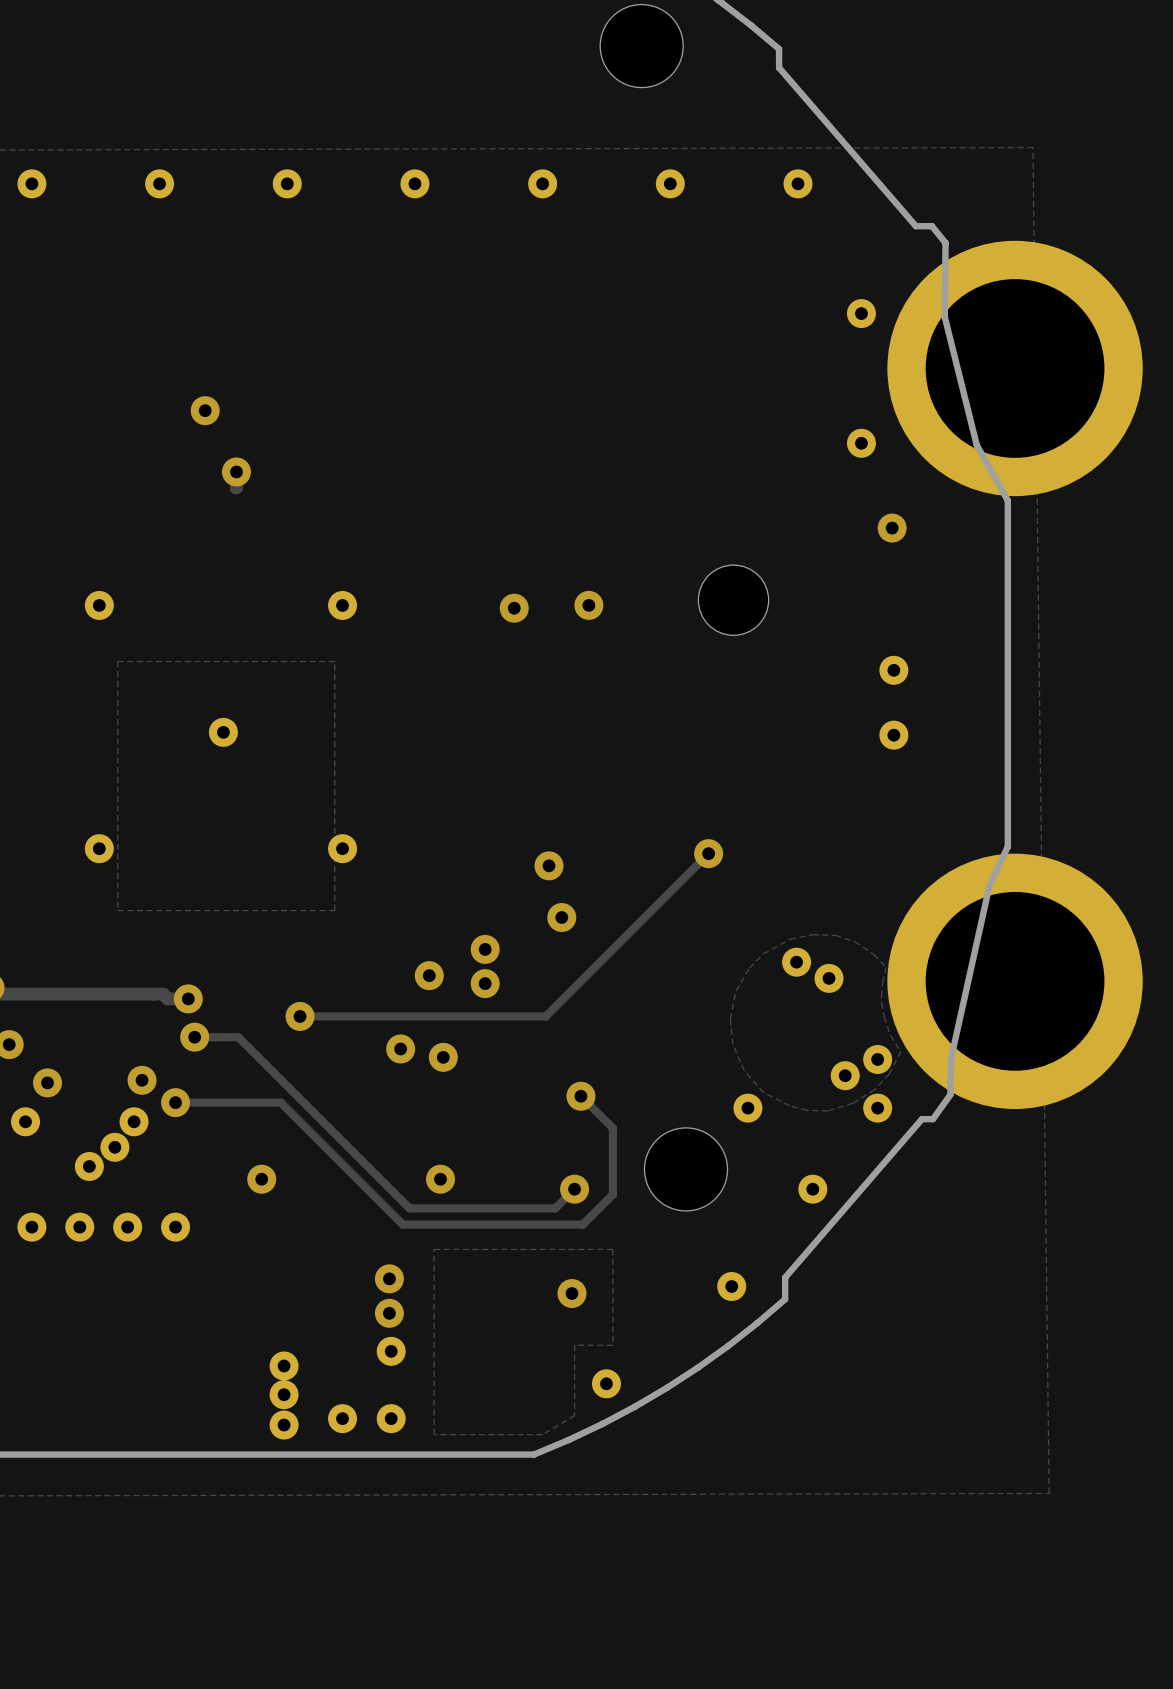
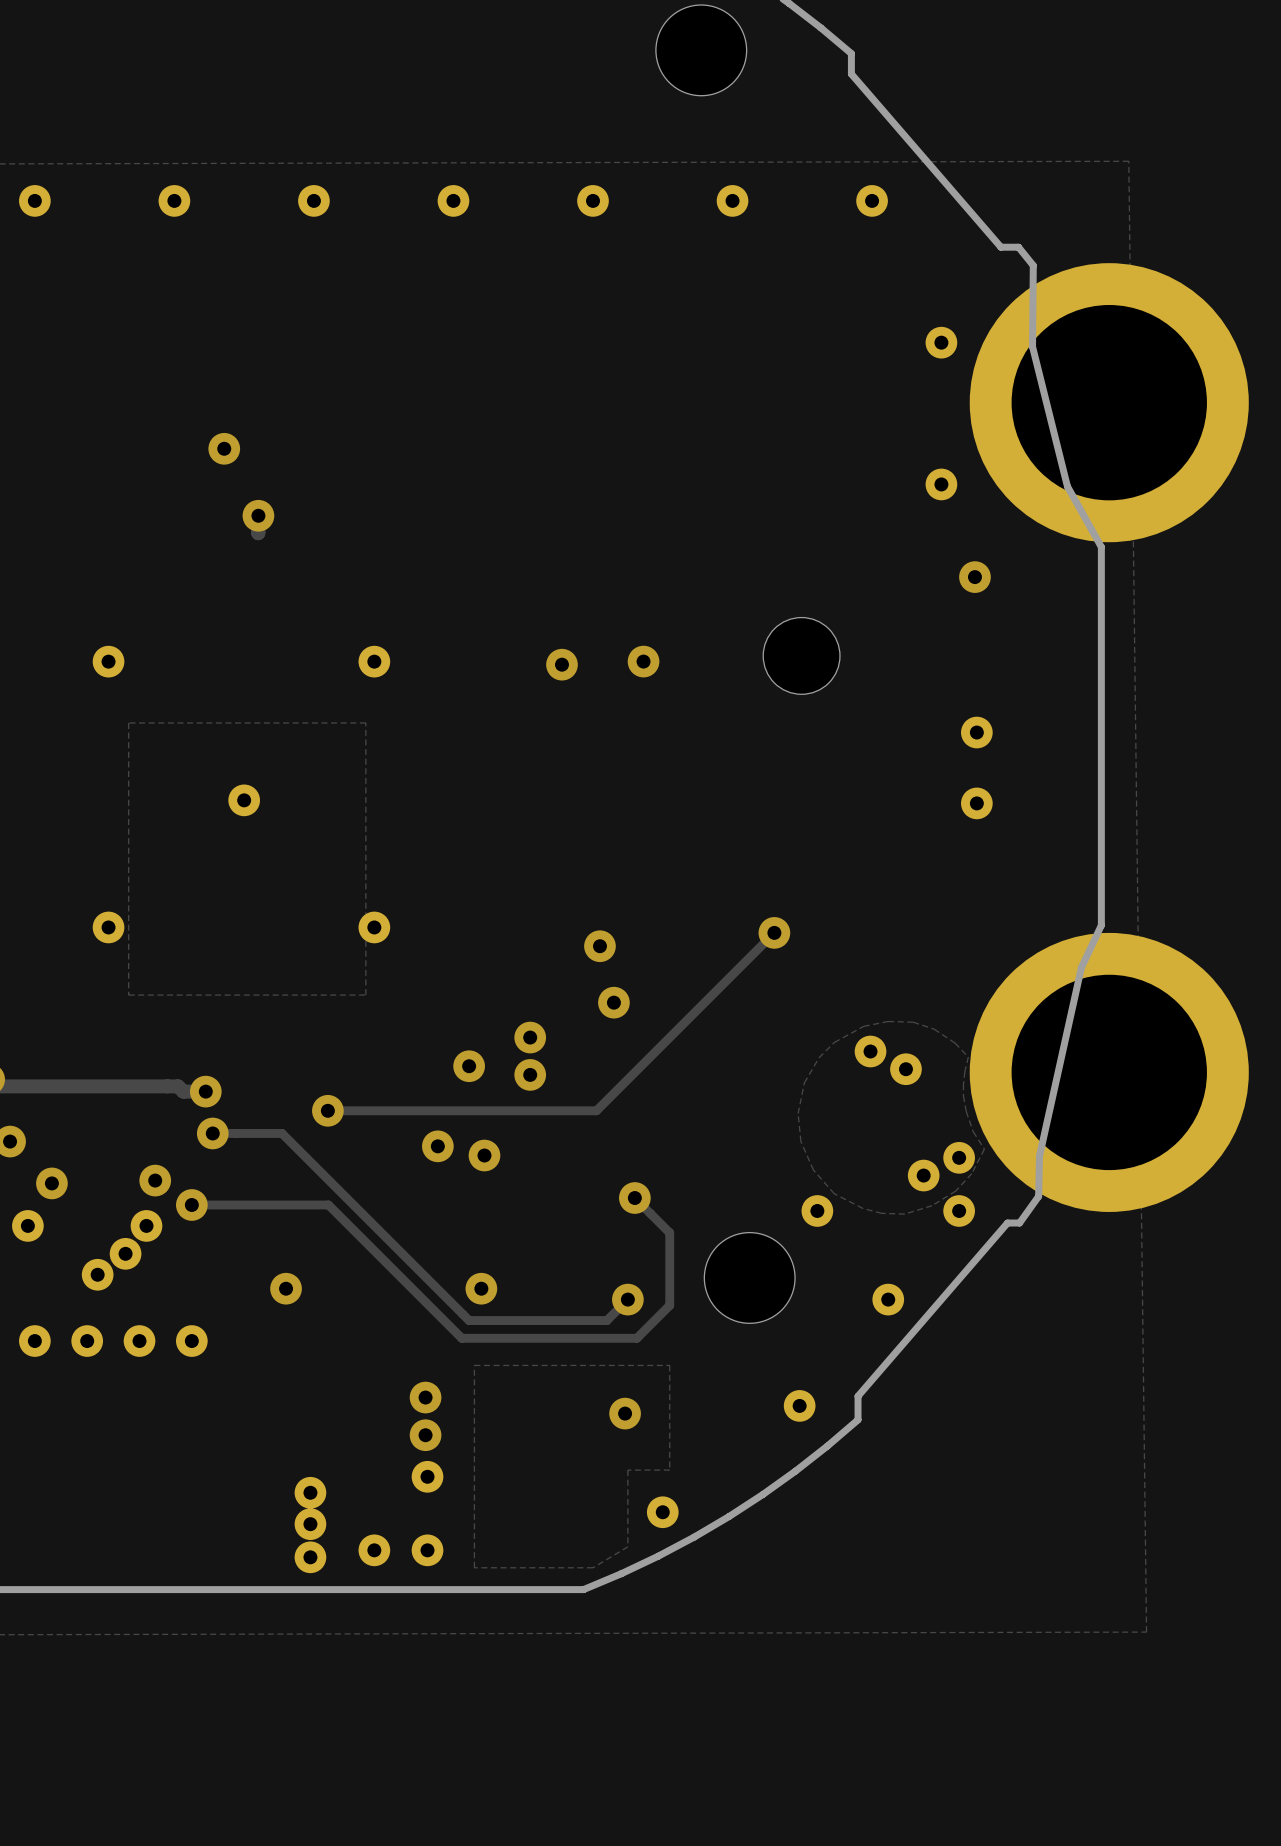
track: (238, 1037) (409, 1208) (429, 1208) -> (260, 1133) (282, 1133) (469, 1320)
track: (280, 1102) (402, 1224) (422, 1224) -> (306, 1204) (328, 1204) (461, 1338)

